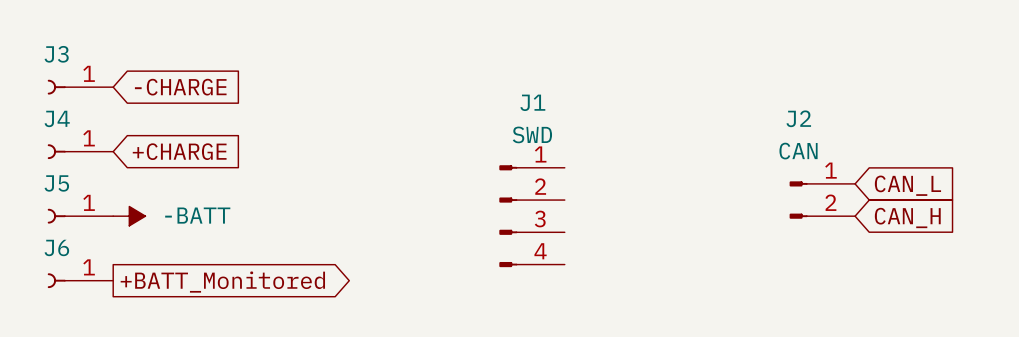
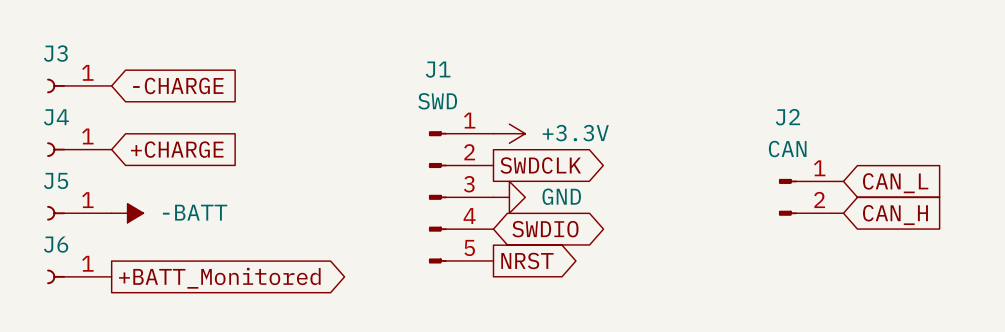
J1 name position: J1 (532, 102) -> J1 (438, 69)
J1 value position: SWD (532, 134) -> SWD (437, 101)
power symbol: none -> +3.3V (509, 133)
J1 symbol: [499, 165, 565, 268] -> [428, 131, 494, 264]
global label: none -> SWDCLK (540, 165)
power symbol: none -> GND (509, 197)
global label: none -> SWDIO (545, 229)
global label: none -> NRST (527, 260)

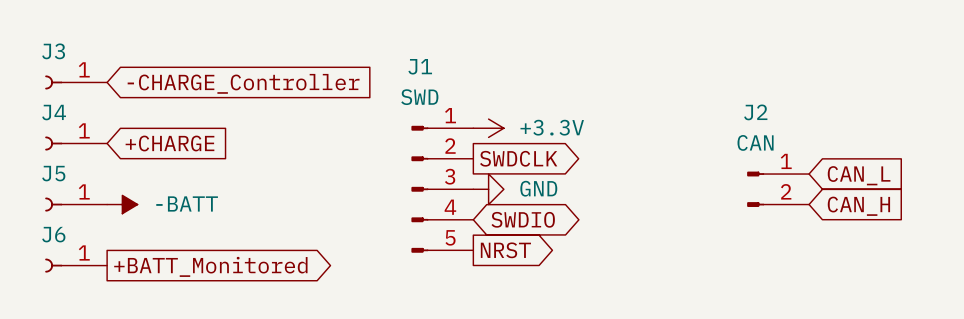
global label: -CHARGE (178, 85) -> -CHARGE_Controller (243, 83)

